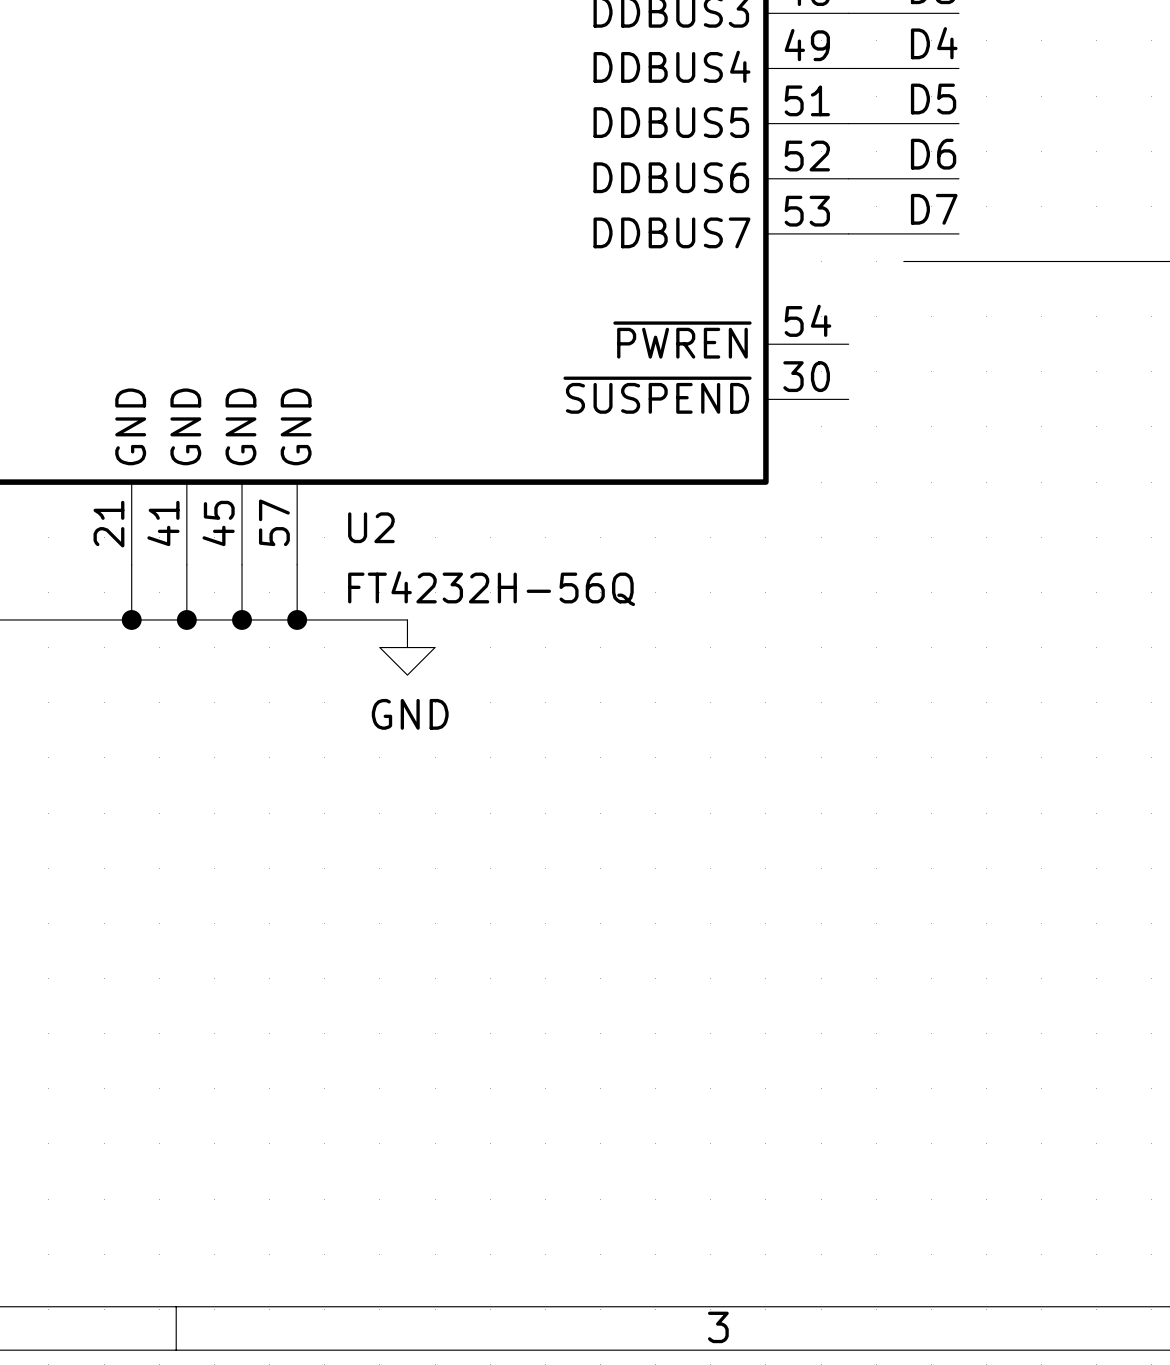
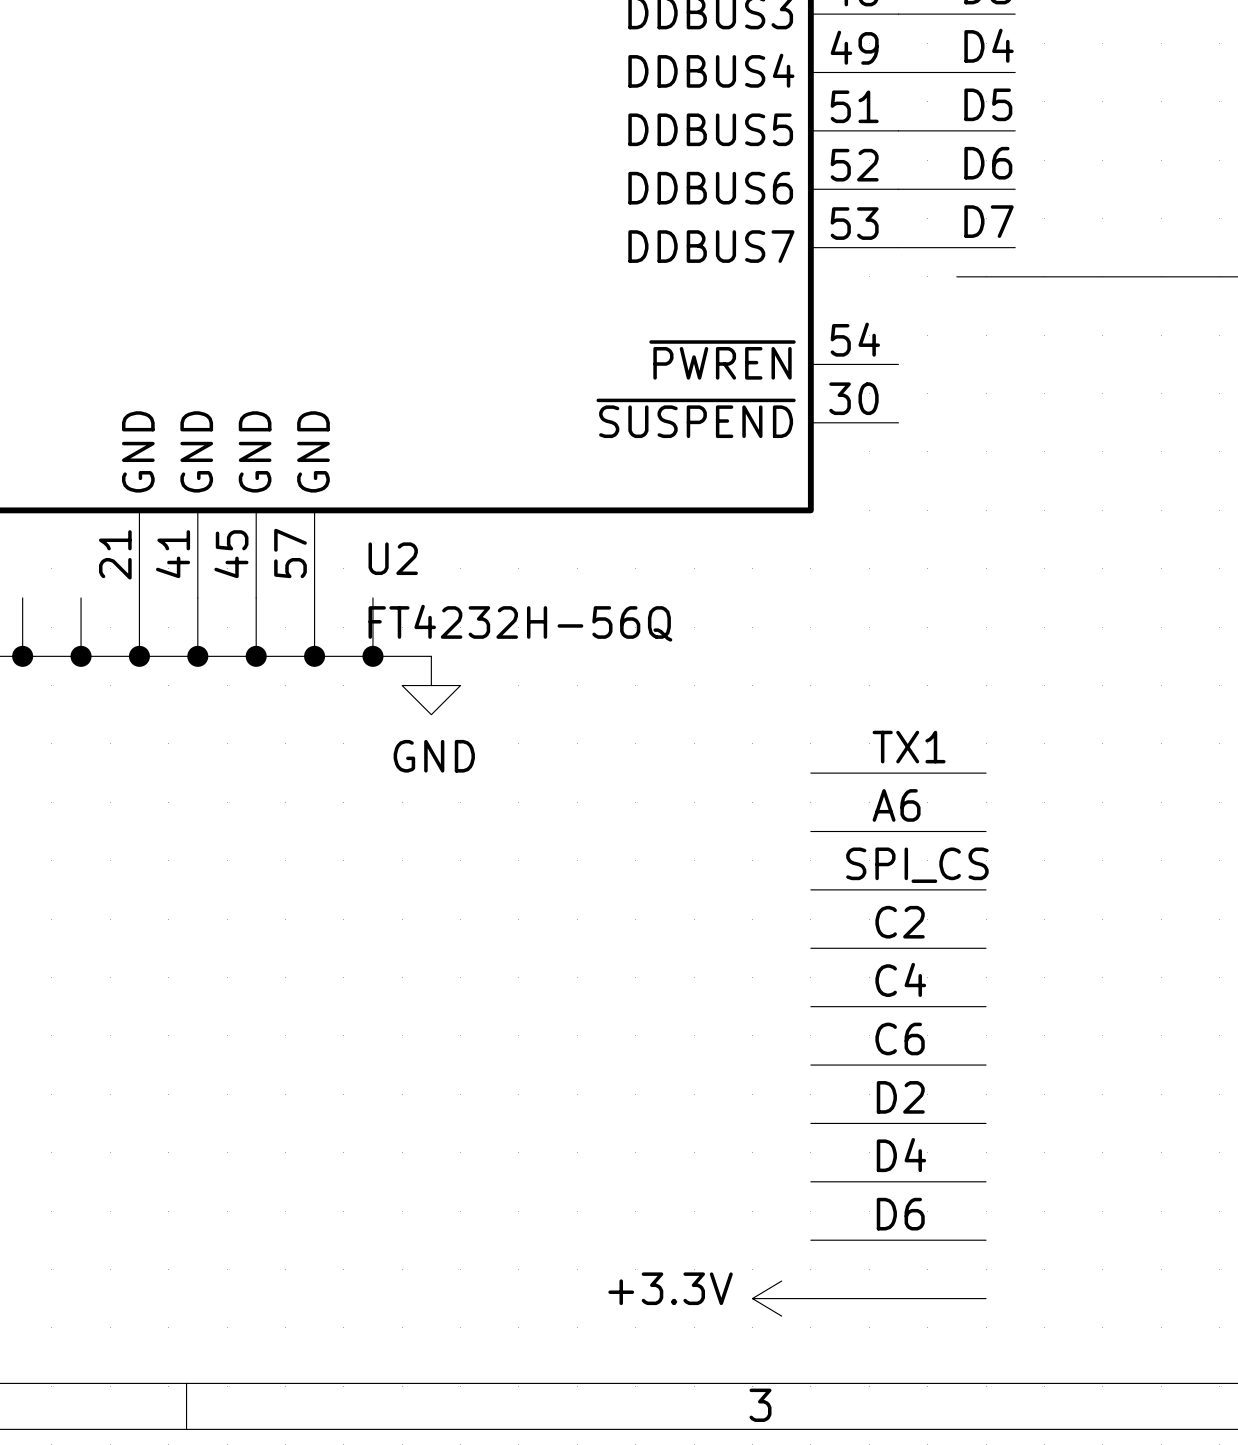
wire: none -> (22, 597) (22, 656)
wire: none -> (81, 597) (81, 656)
wire: none -> (372, 597) (372, 656)
junction: none -> (22, 656)
junction: none -> (81, 656)
junction: none -> (372, 656)
label: none -> TX1 (909, 747)
wire: none -> (810, 773) (986, 773)
label: none -> A6 (896, 805)
wire: none -> (810, 831) (986, 831)
label: none -> SPI_CS (917, 865)
wire: none -> (810, 889) (986, 889)
label: none -> C2 (900, 922)
wire: none -> (810, 948) (986, 948)
label: none -> C4 (900, 979)
wire: none -> (810, 1006) (986, 1006)
label: none -> C6 (900, 1038)
wire: none -> (810, 1065) (986, 1065)
label: none -> D2 (900, 1097)
wire: none -> (810, 1123) (986, 1123)
label: none -> D4 (901, 1155)
wire: none -> (810, 1181) (986, 1181)
label: none -> D6 (900, 1214)
wire: none -> (810, 1240) (986, 1240)
power symbol: none -> +3.3V (781, 1298)
wire: none -> (810, 1298) (986, 1298)

